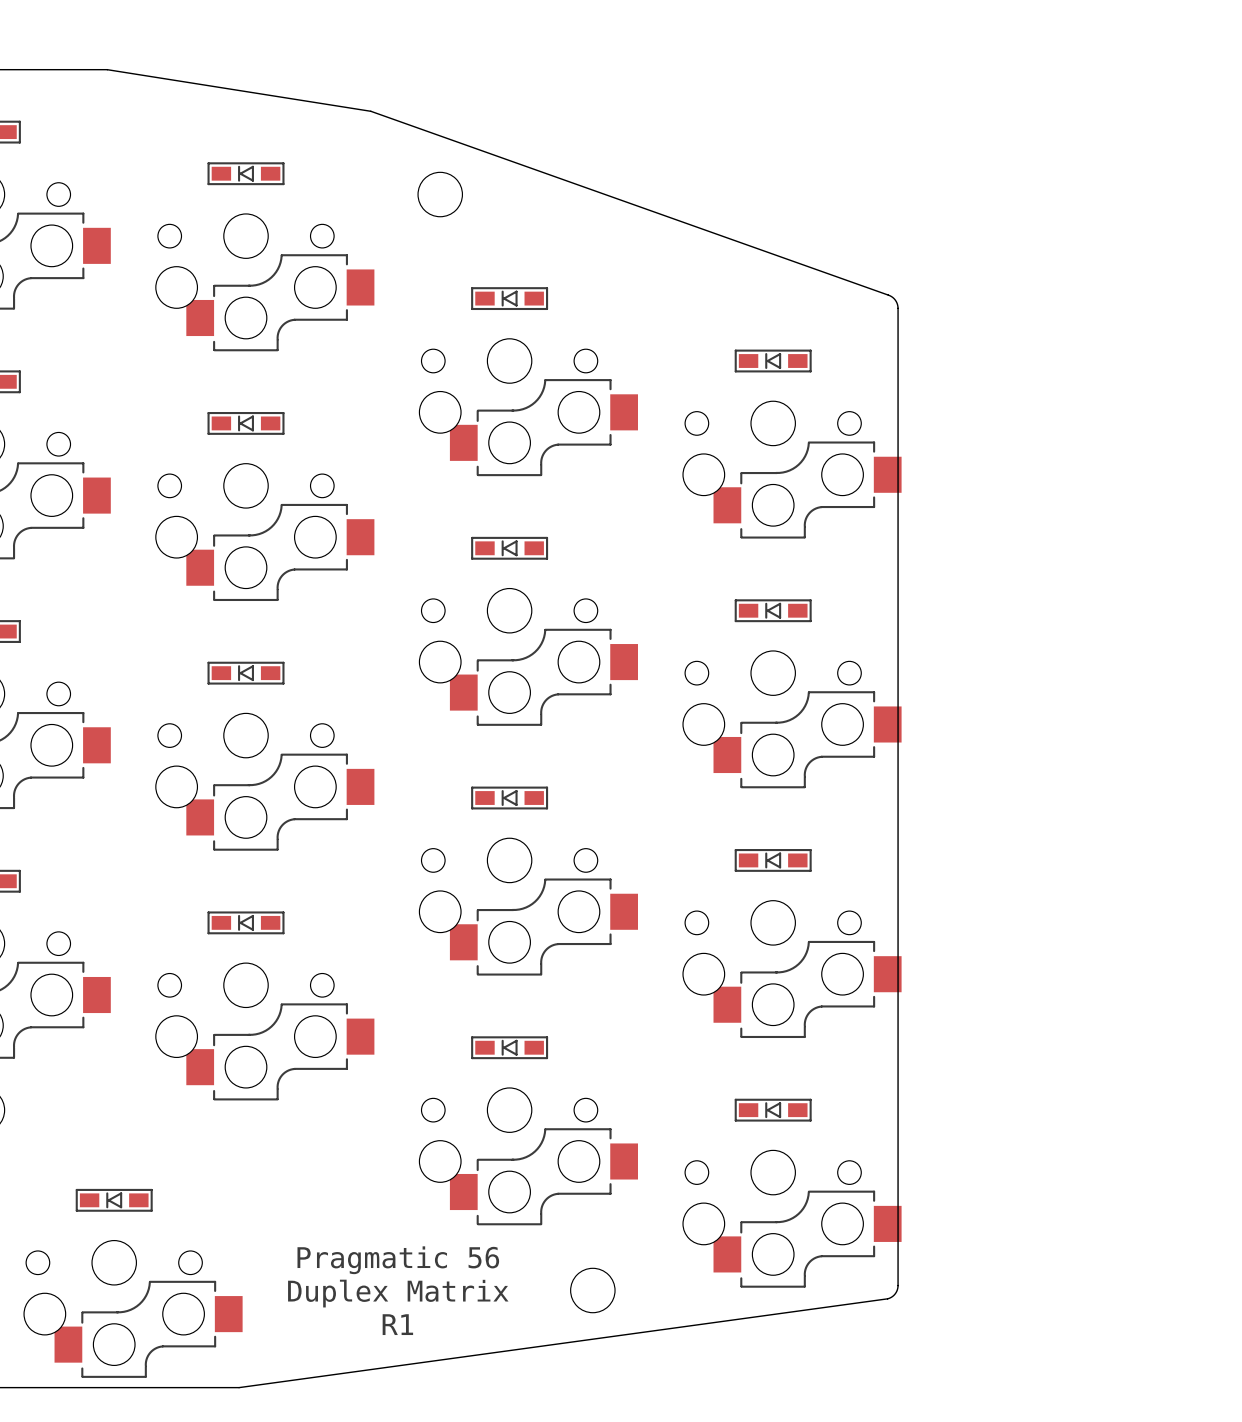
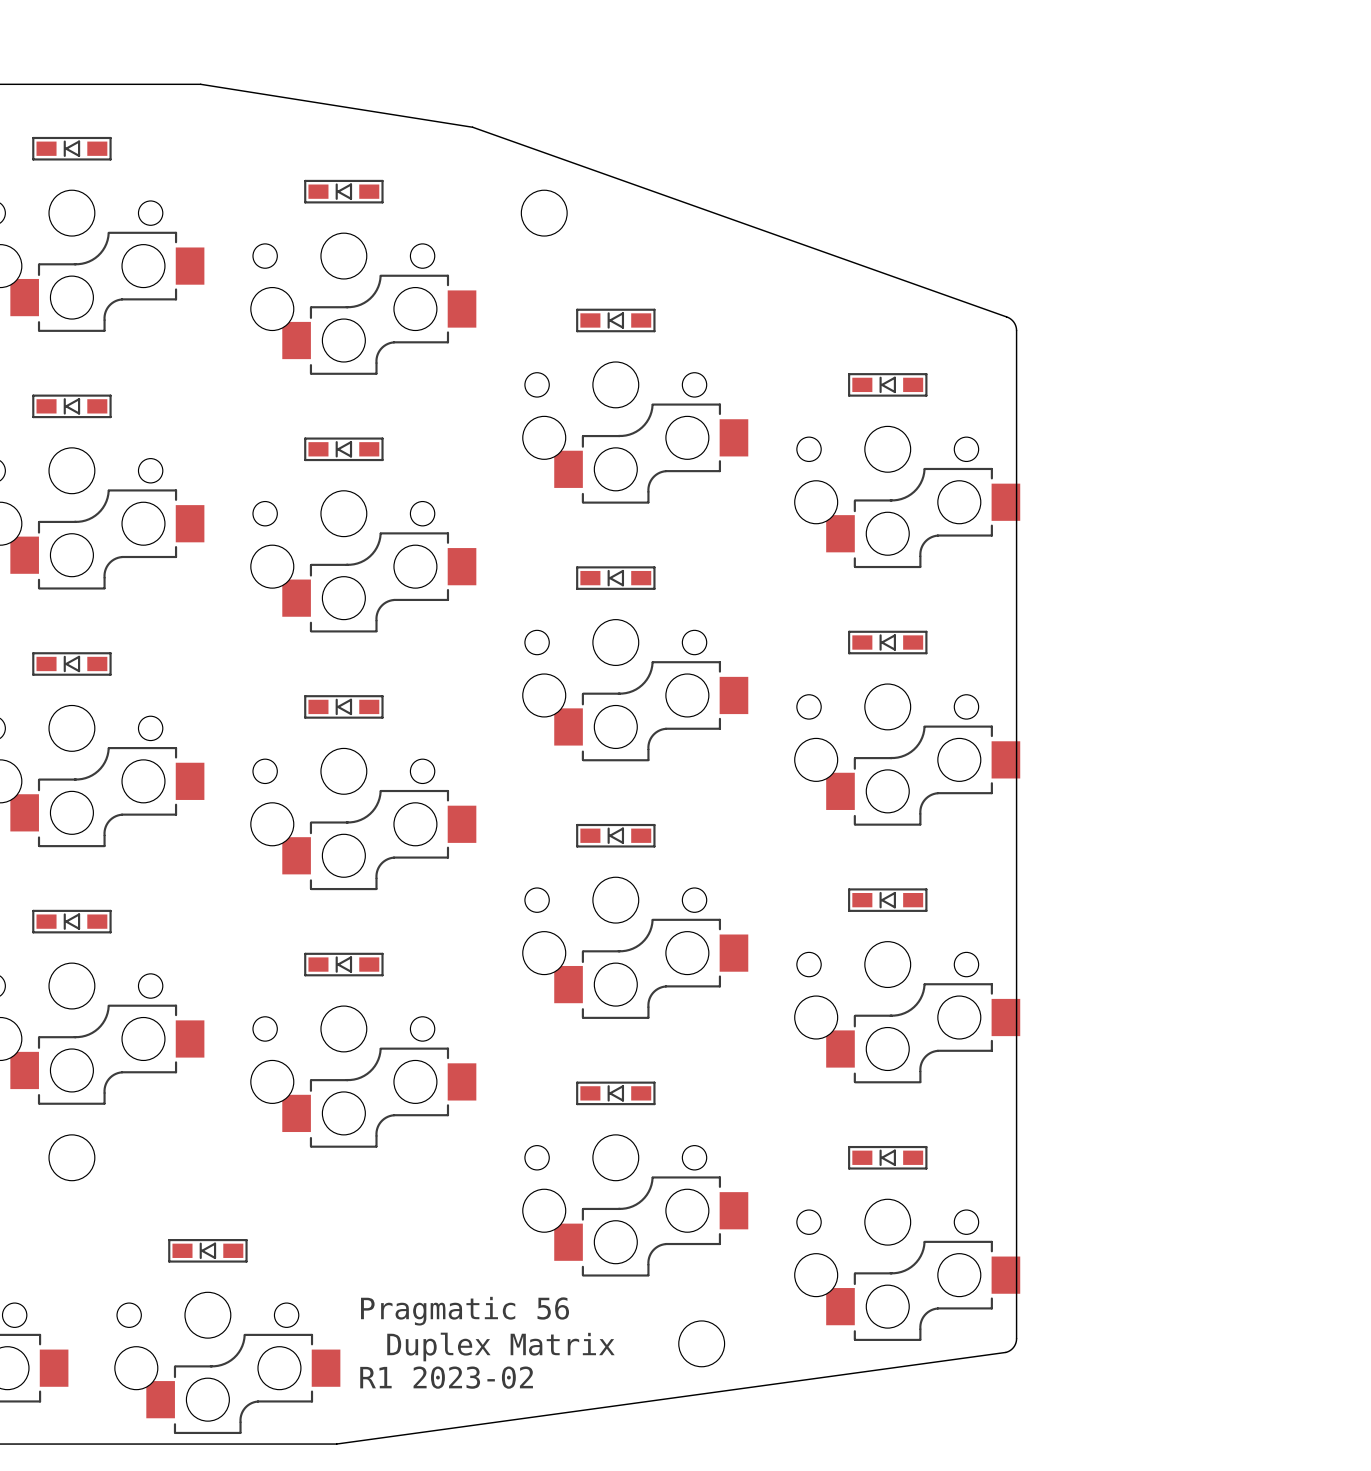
text position: Pragmatic 56 (398, 1260) -> Pragmatic 56 (465, 1311)
text: none -> R1 2023-02 (446, 1377)
text: R1 (397, 1324) -> none

